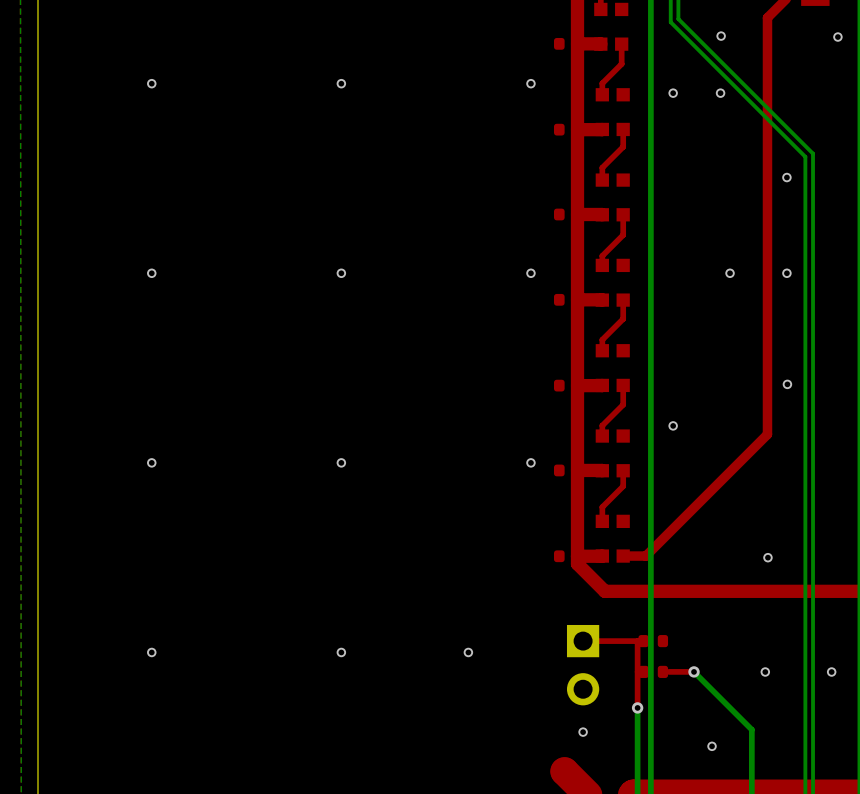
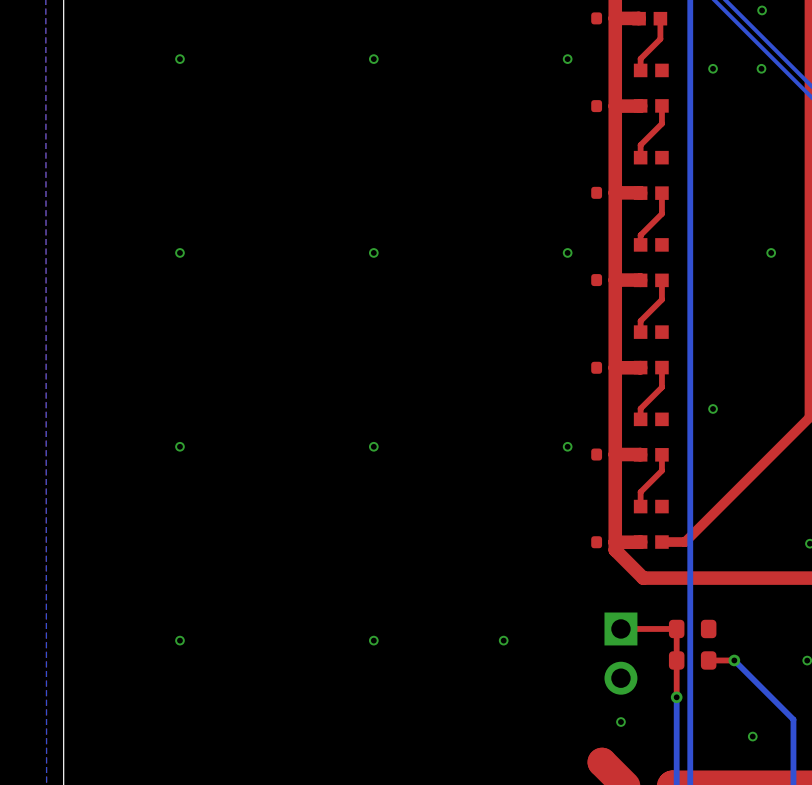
part footprint: [638, 635, 669, 648] -> [668, 619, 717, 639]
part footprint: [638, 665, 669, 678] -> [668, 651, 717, 670]

